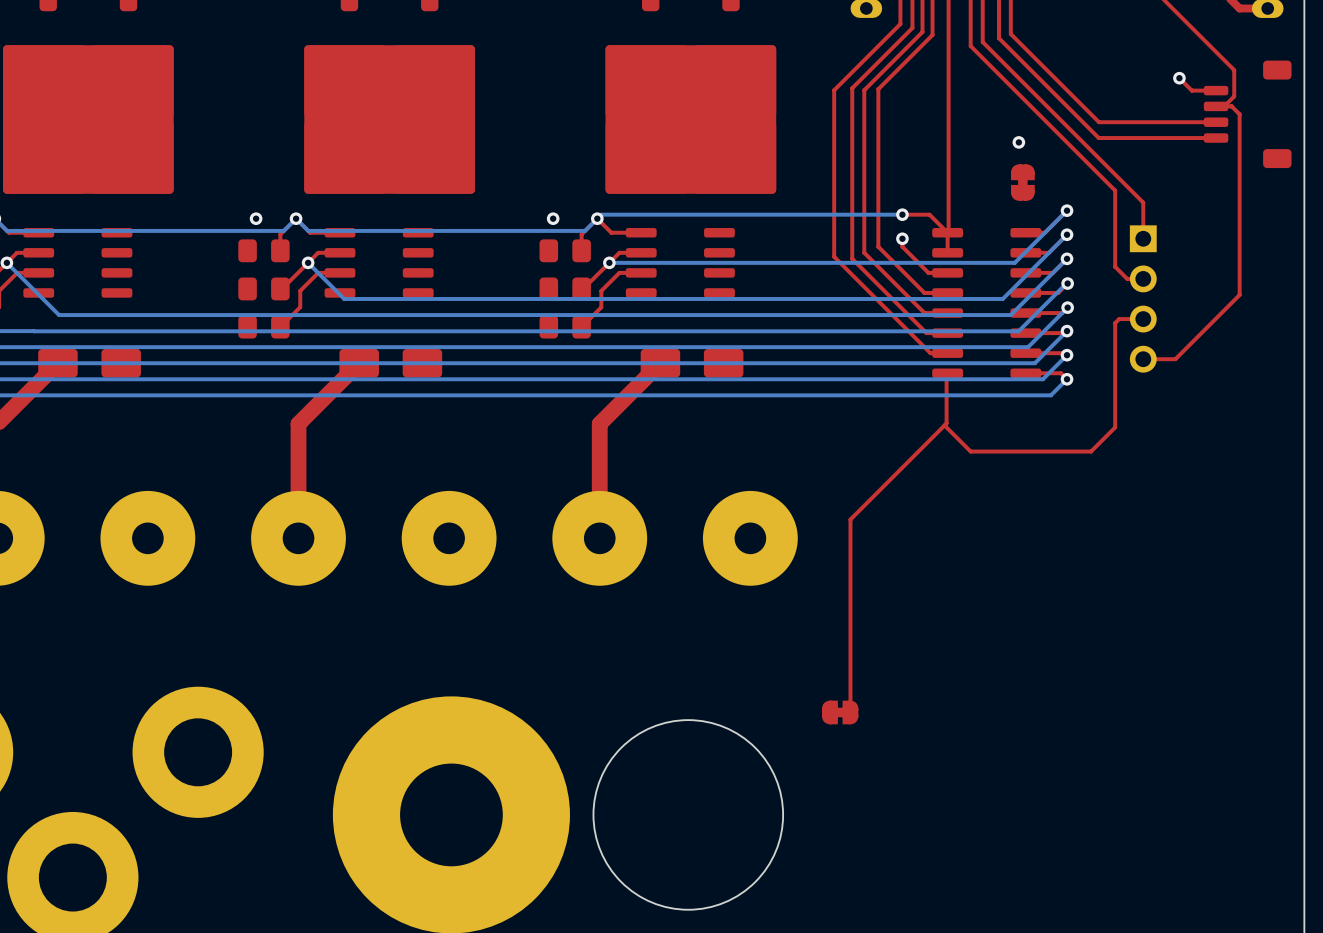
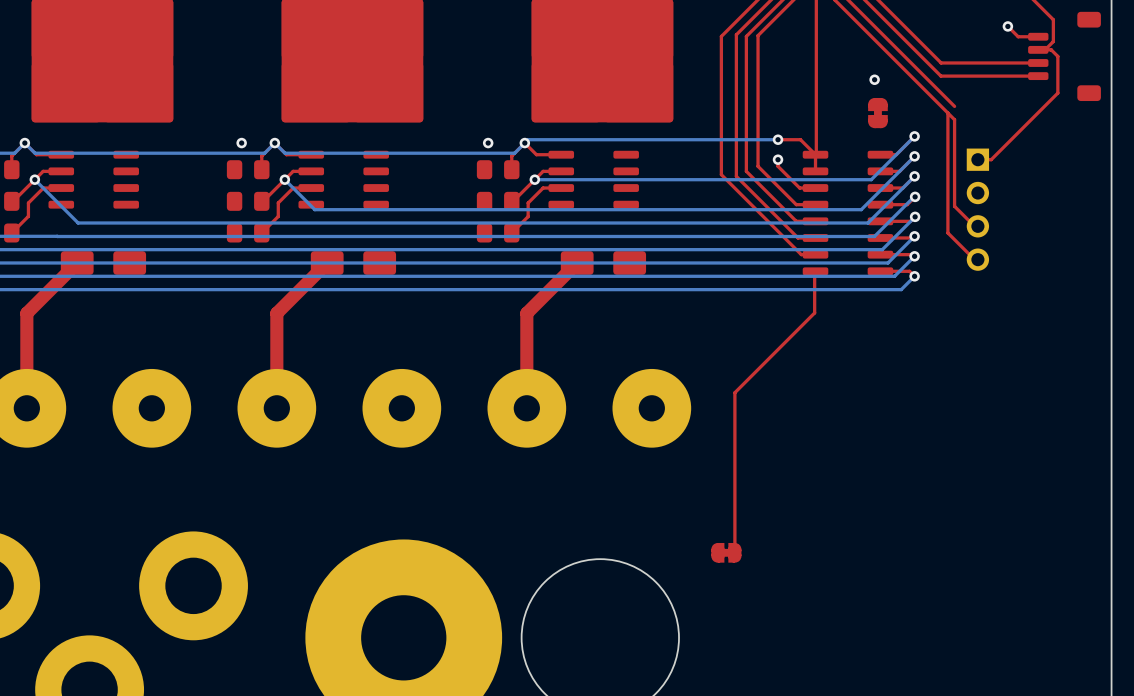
top track: (1239, 158) (1239, 294) (1175, 359) (1143, 359) -> (1057, 93) (991, 159) (974, 159)
top track: (1115, 174) (1143, 202) (1143, 238) -> none
top track: none -> (947, 113) (947, 232) (974, 259)
top track: (1115, 266) (1127, 278) (1143, 278) -> (954, 183) (954, 206) (974, 226)
top track: (1143, 319) (1119, 319) (1115, 323) (1115, 427) (1091, 451) (970, 451) (944, 425) -> none

